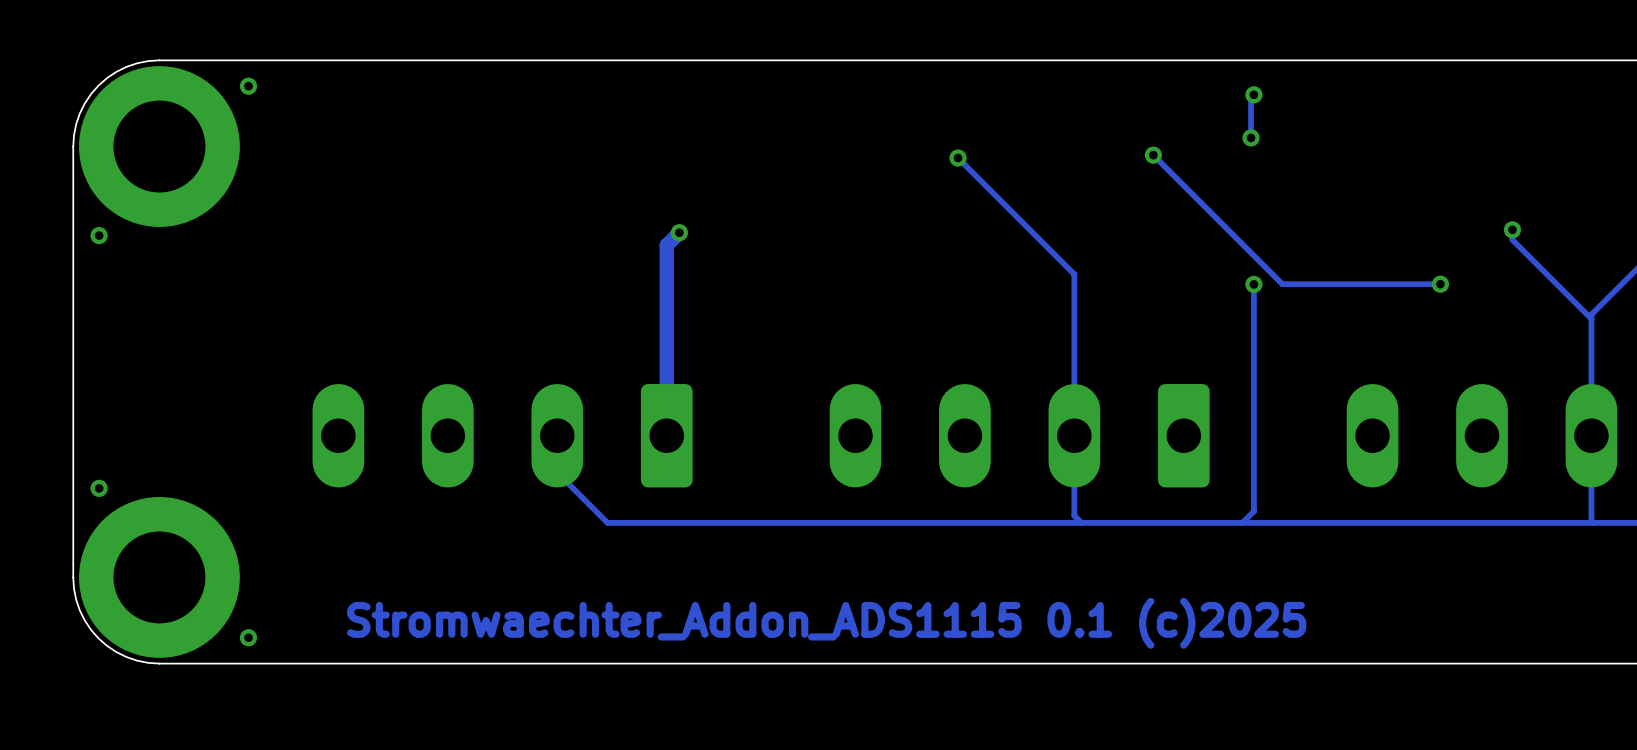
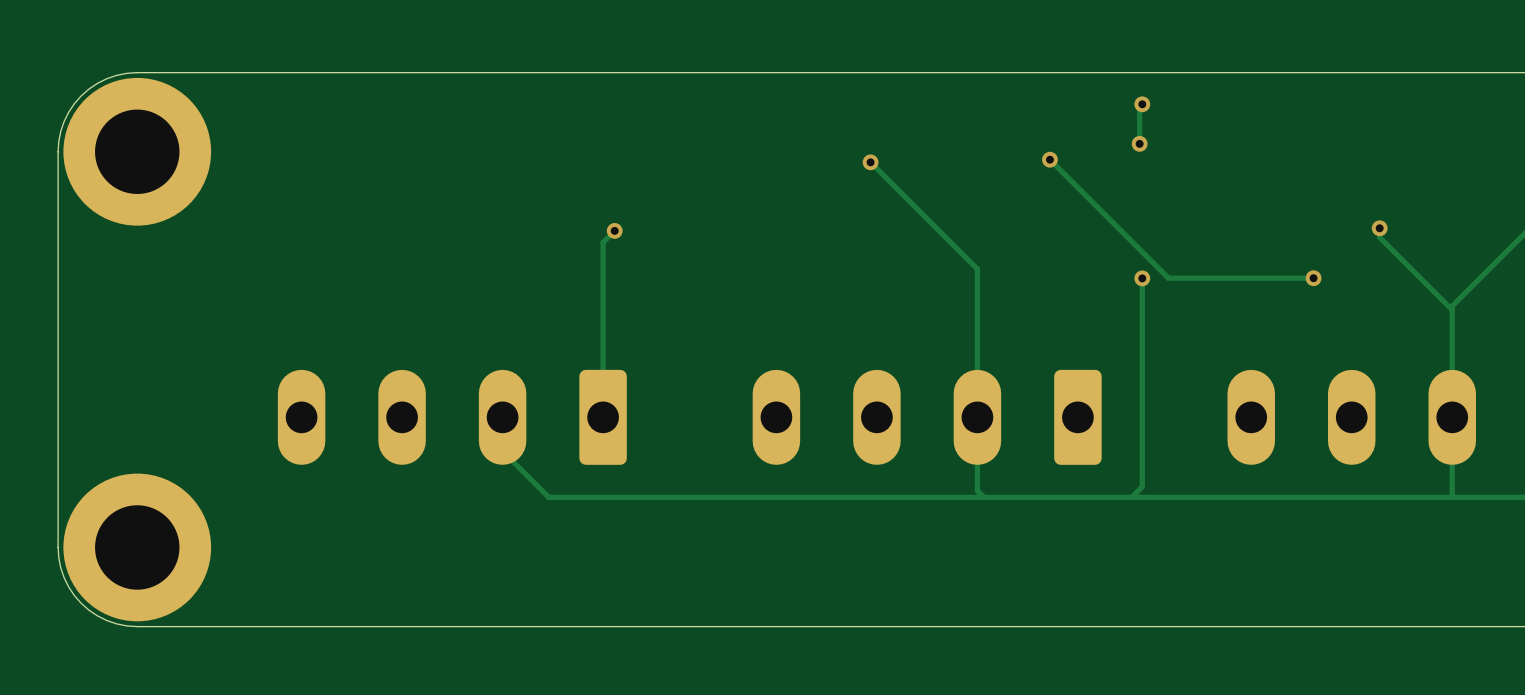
via: (248, 86) -> none
track width: thick (679, 232) (666, 245) (666, 435) -> thin (614, 230) (603, 242) (603, 417)
via: (99, 235) -> none
via: (99, 488) -> none
text: Stromwaechter_Addon_ADS1115 0.1 (c)2025 (826, 623) -> none
via: (248, 637) -> none

